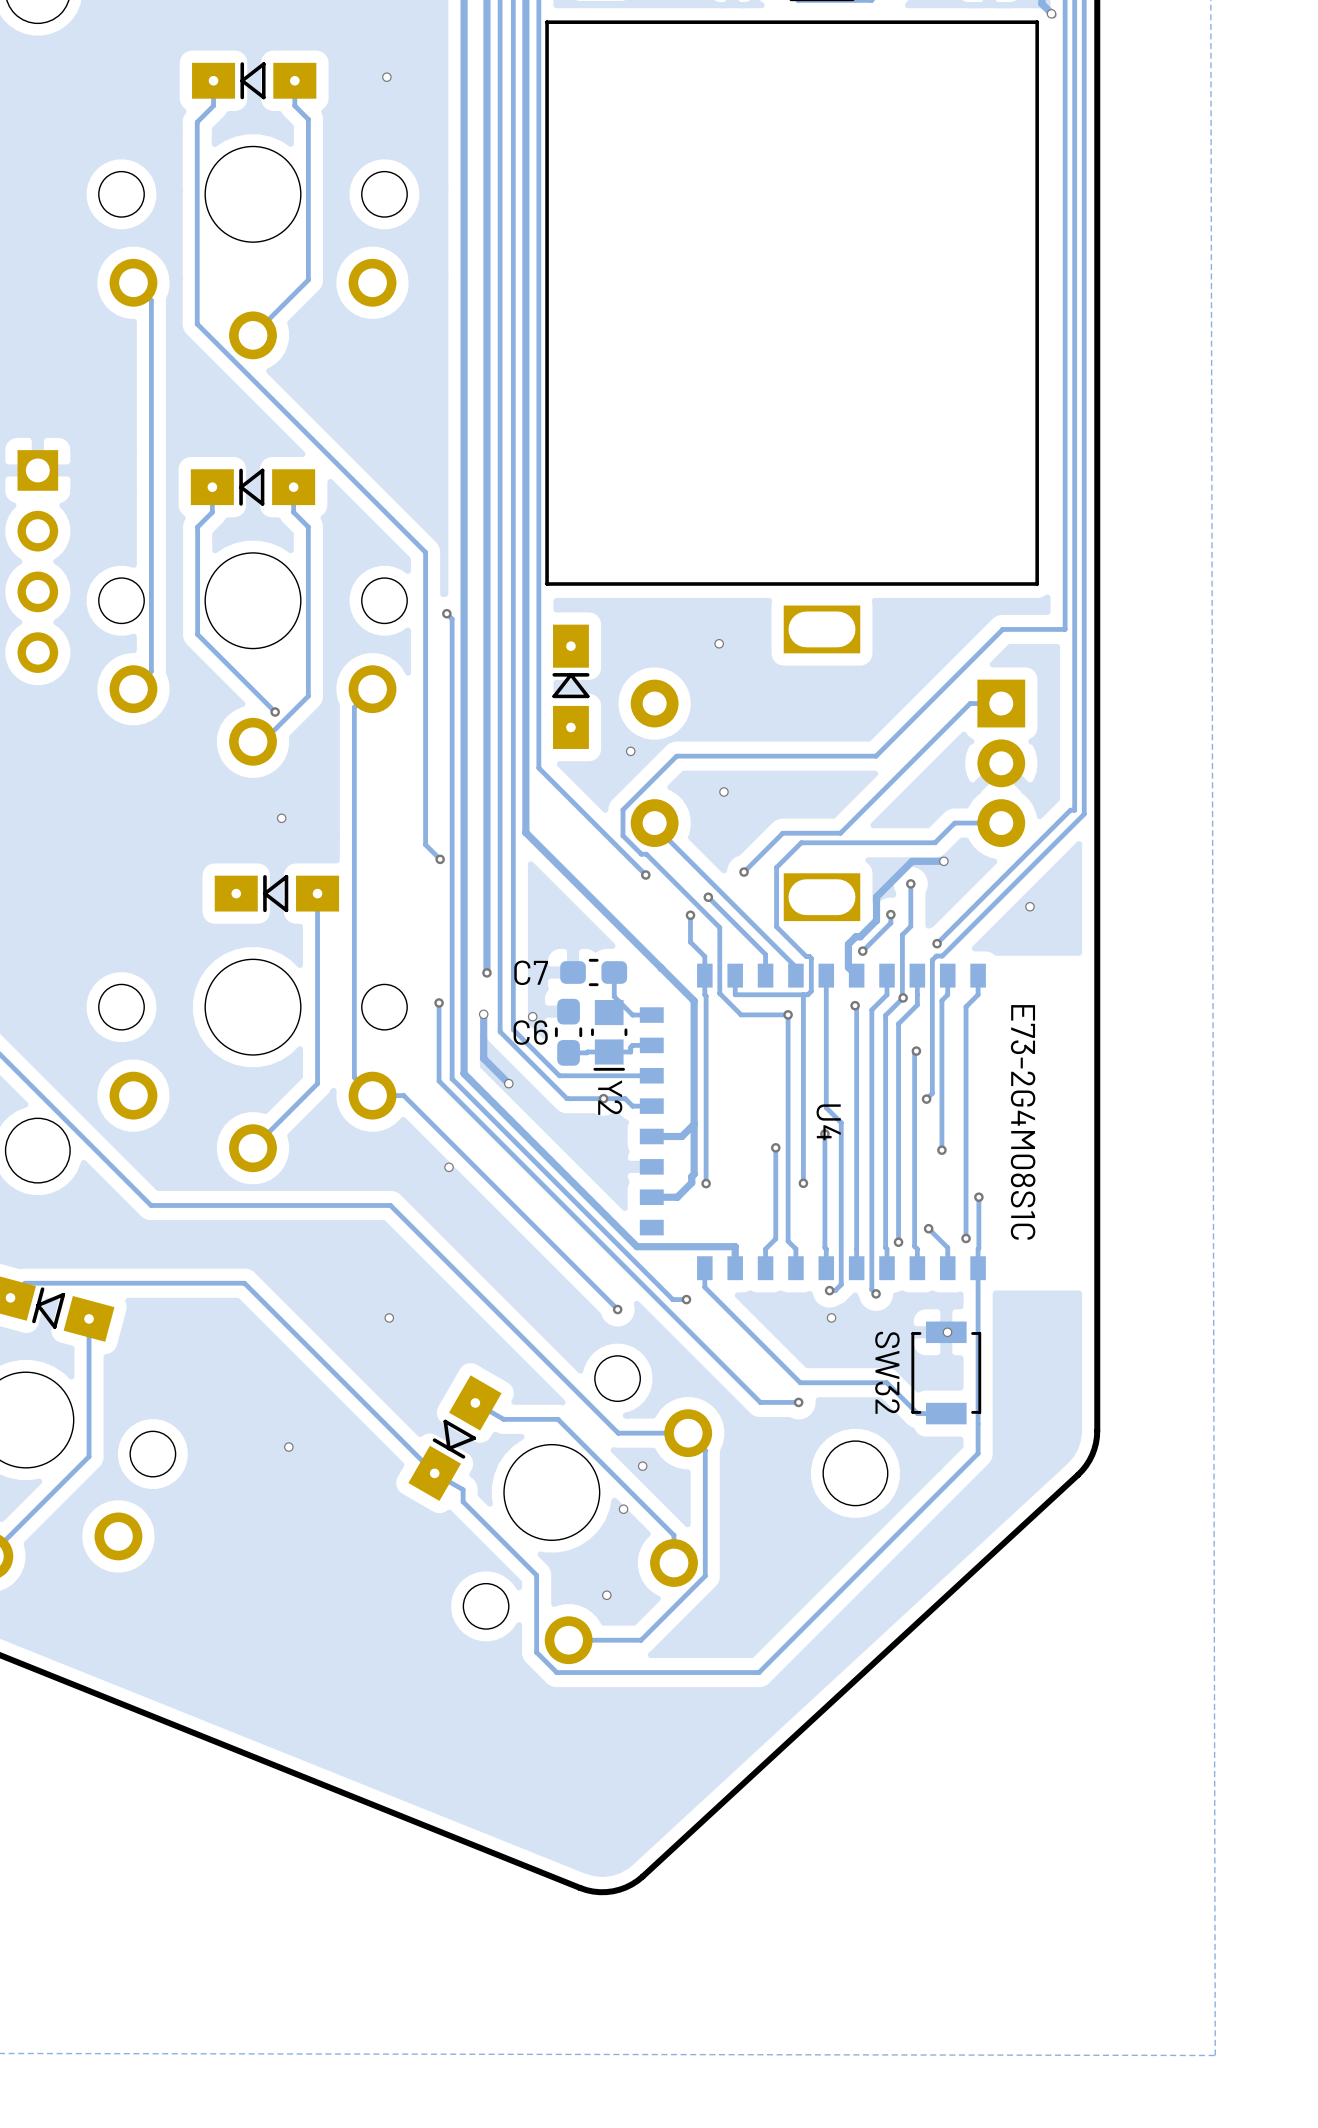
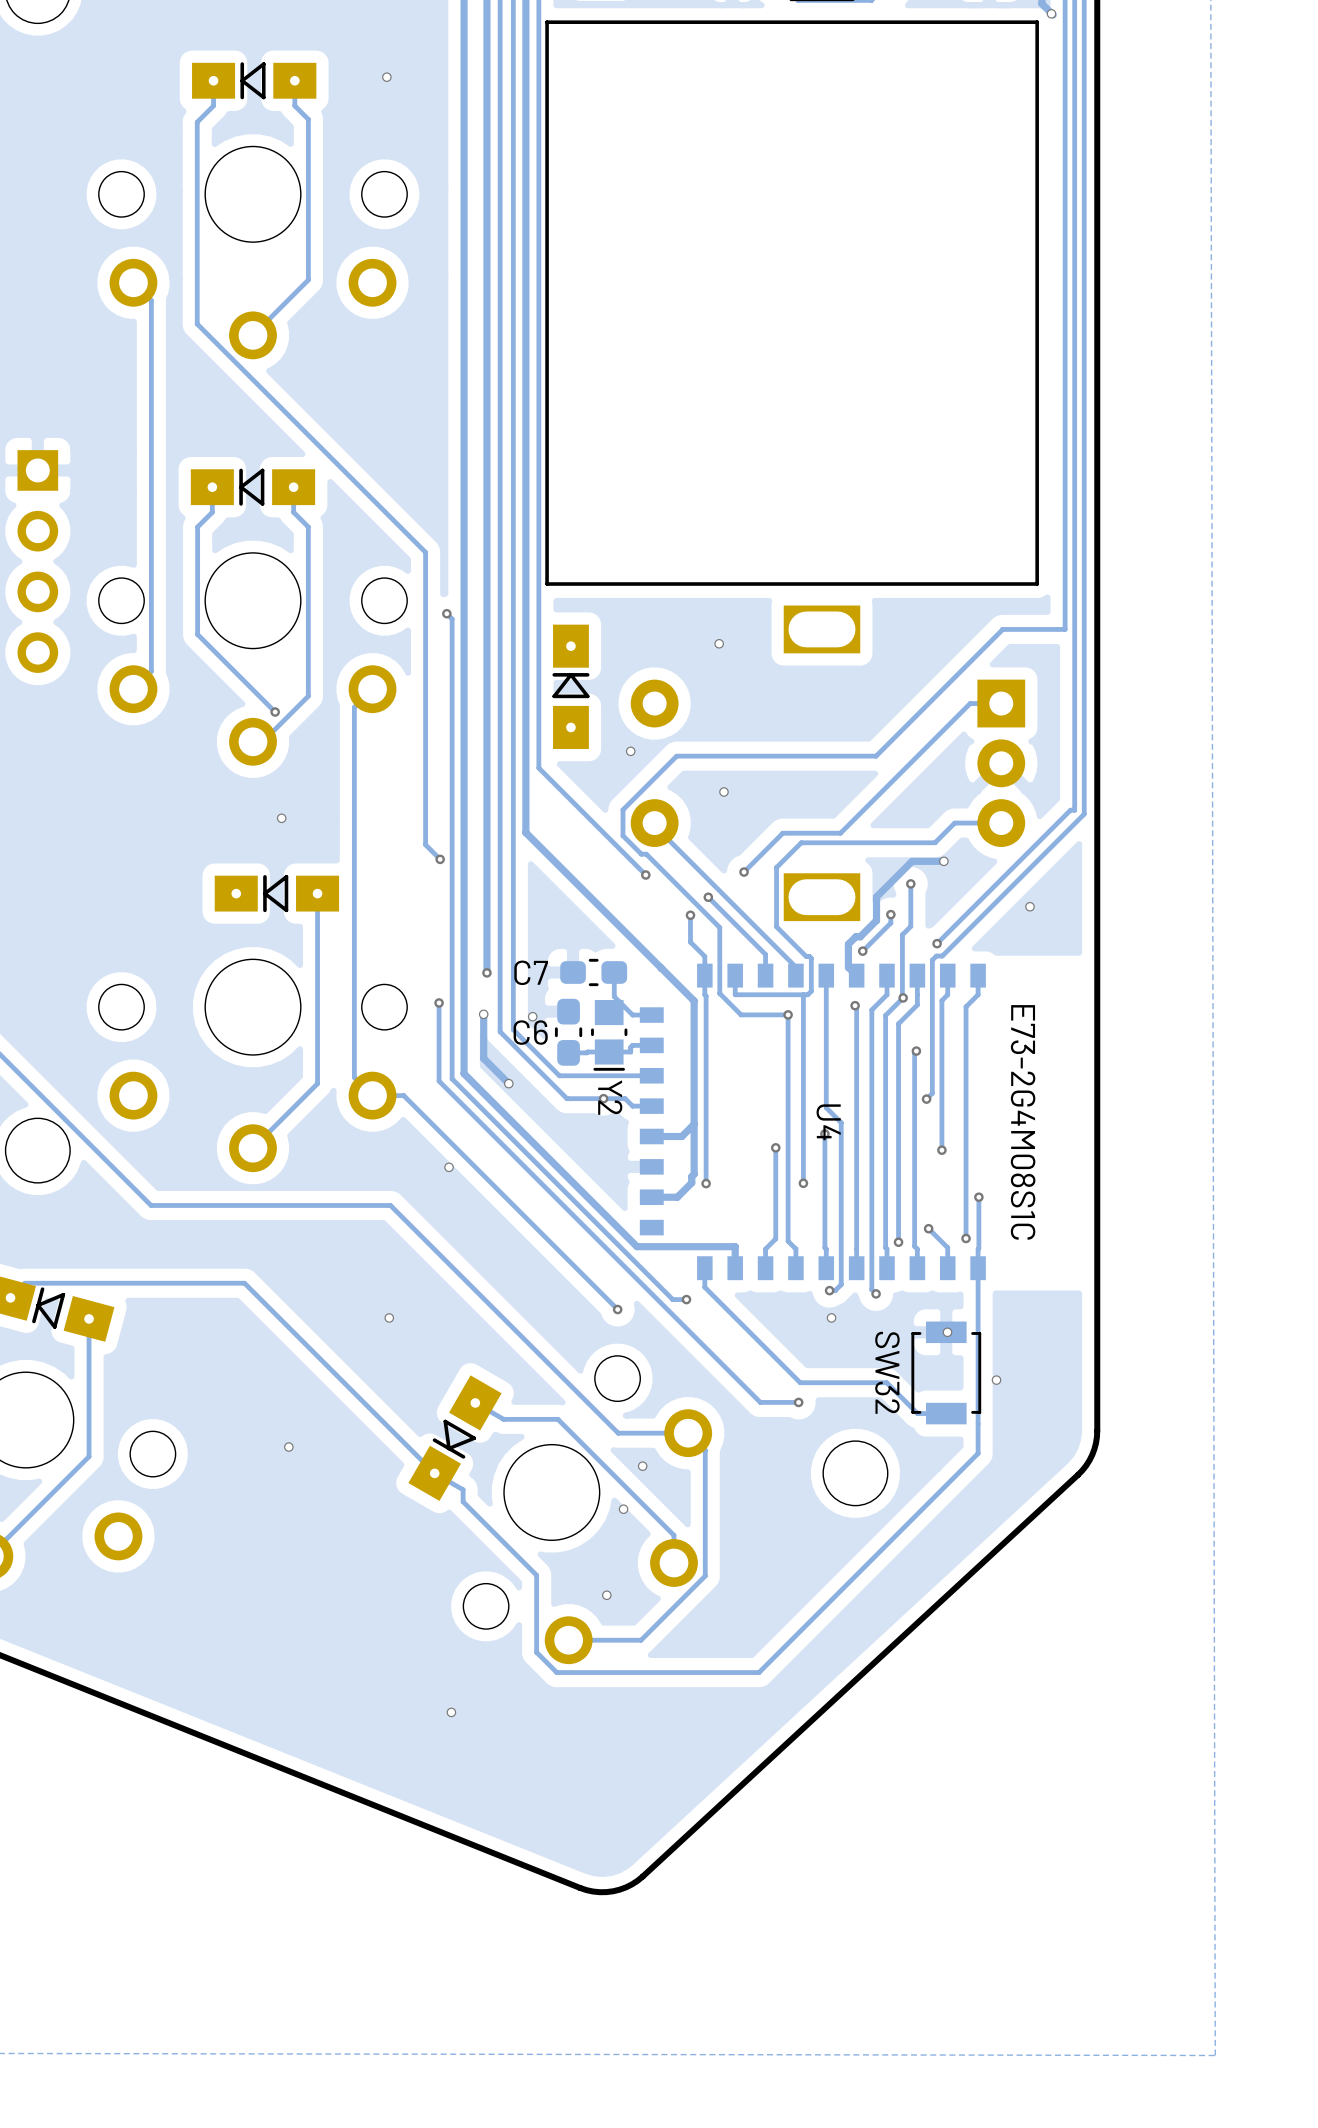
via: none -> (996, 1380)
via: none -> (451, 1712)

